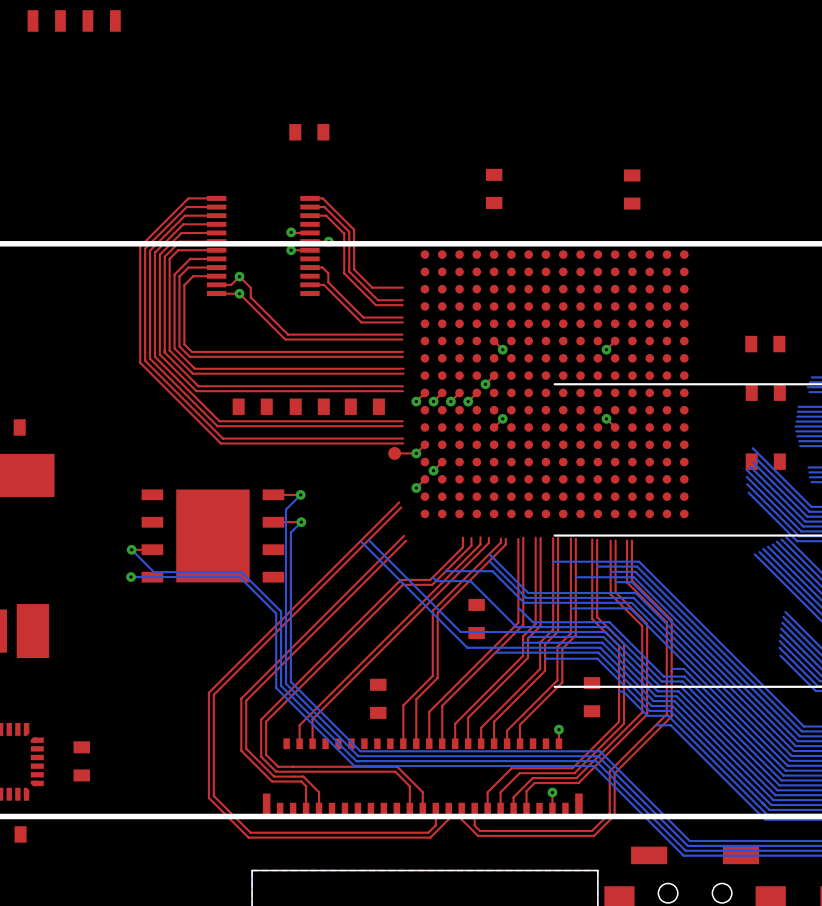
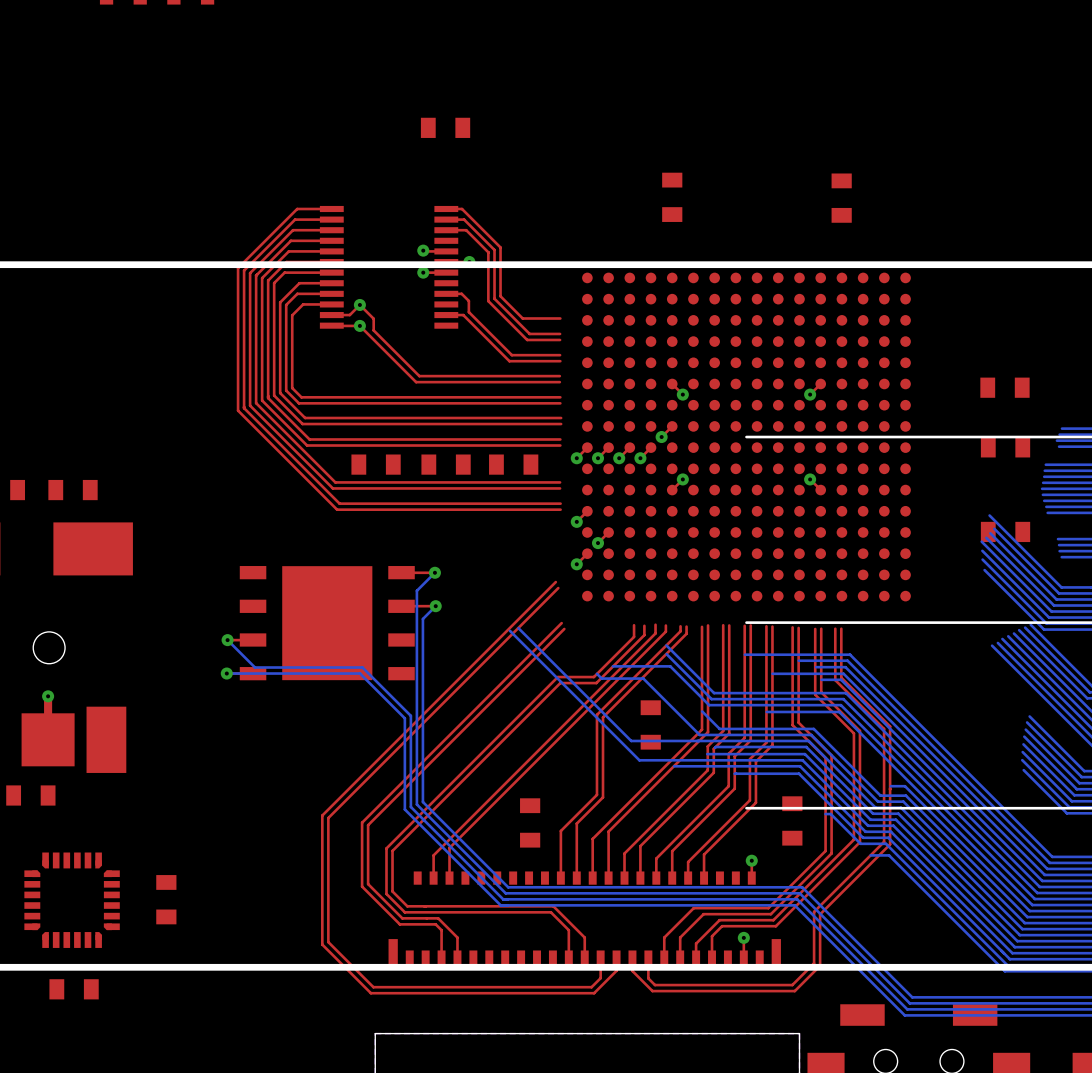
part: (394, 453) -> none
top track: (416, 453) (394, 453) -> none

